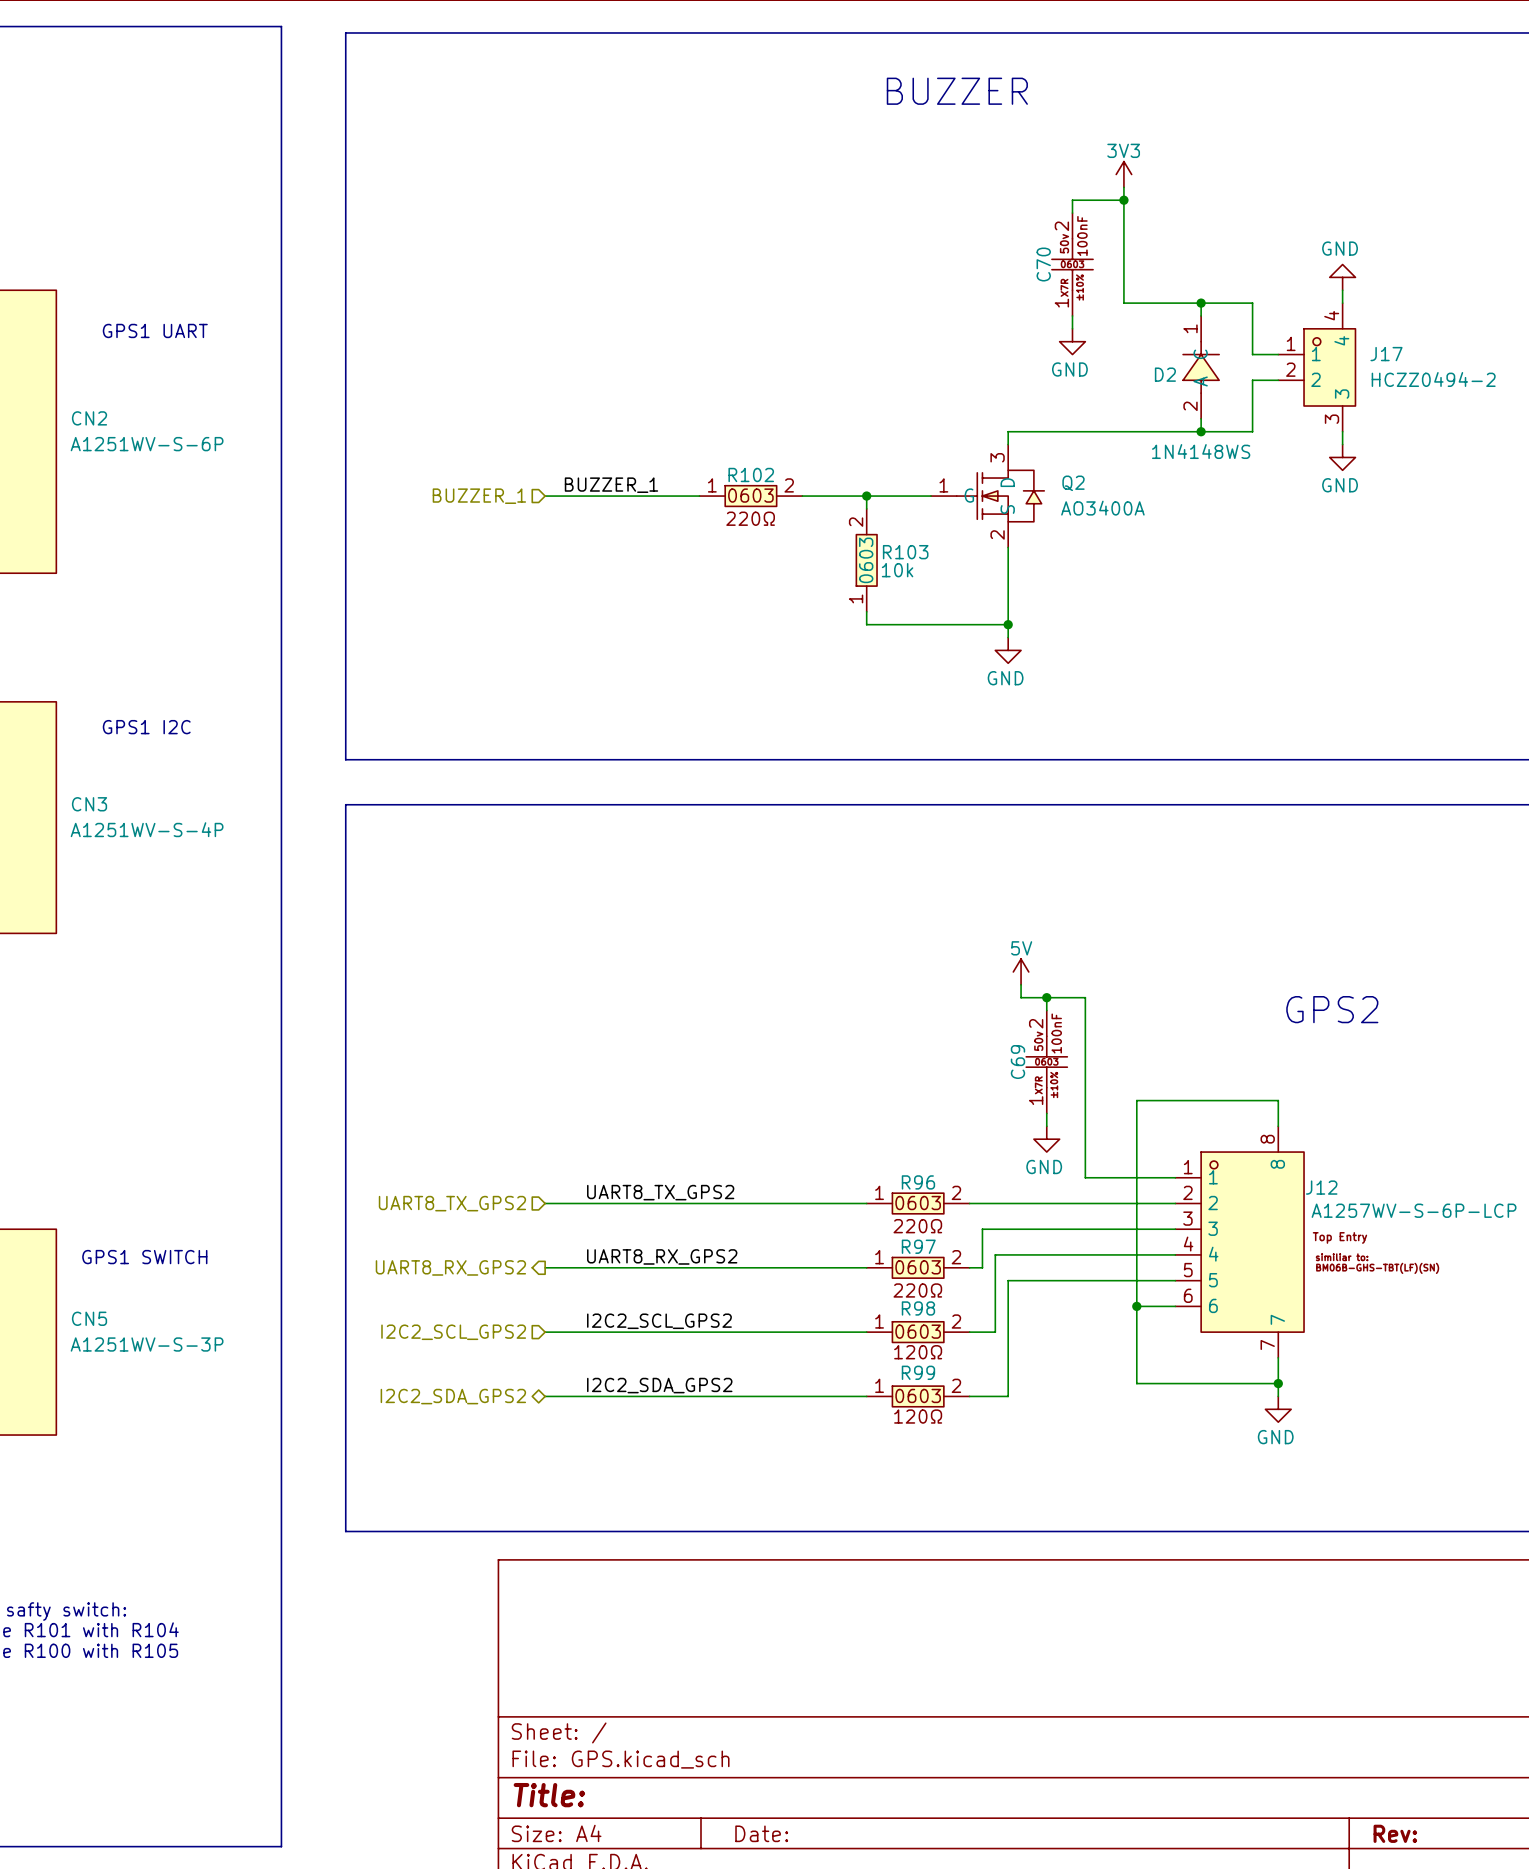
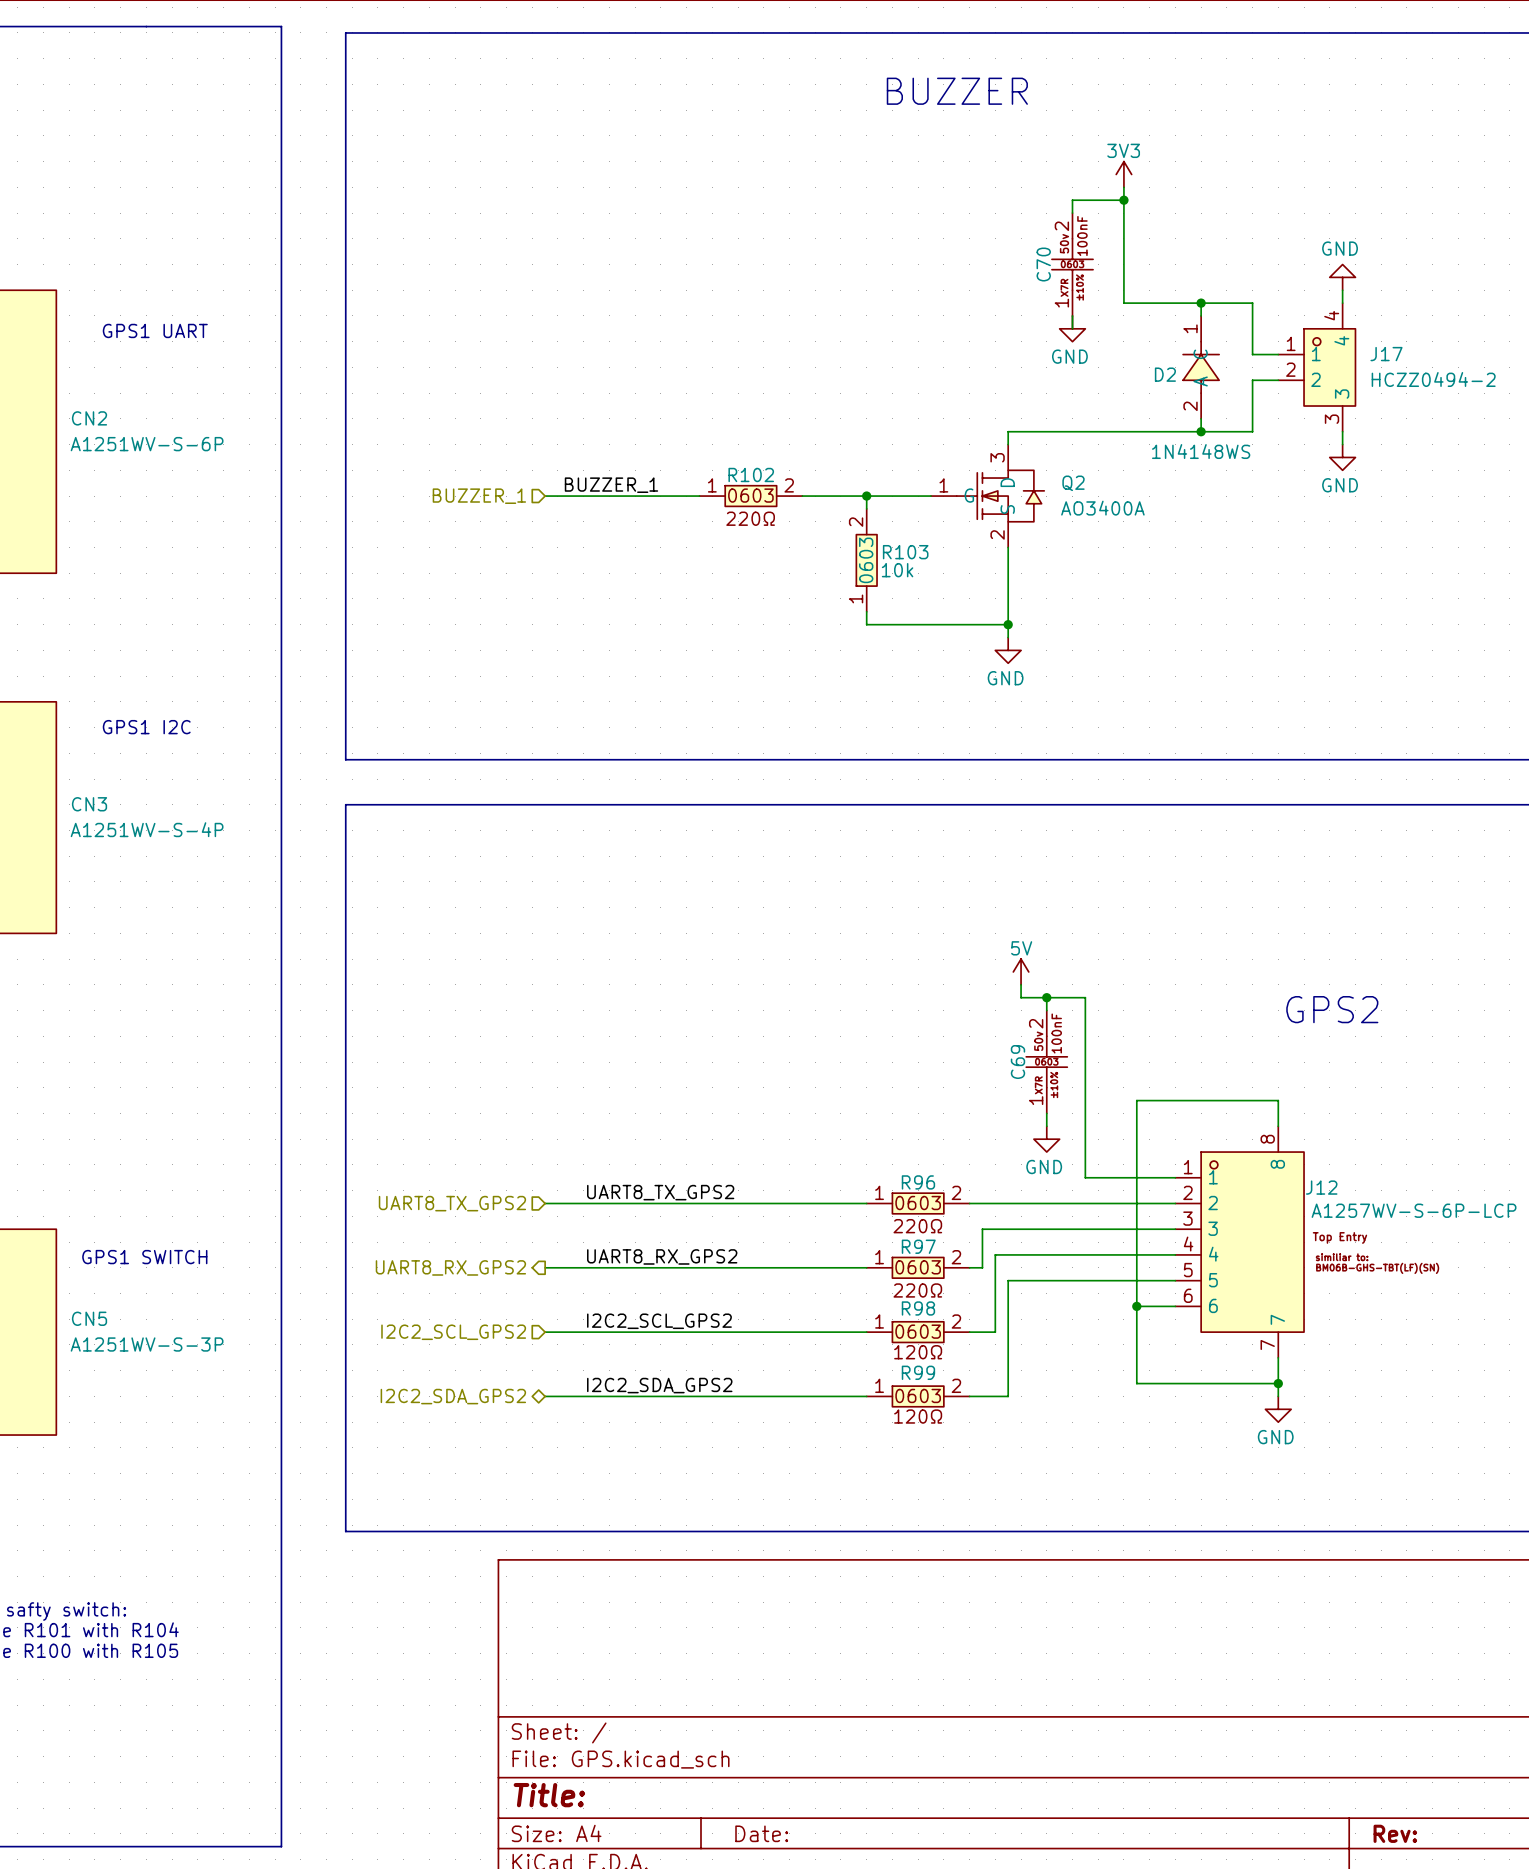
power symbol position: GND (1072, 341) -> GND (1072, 328)

